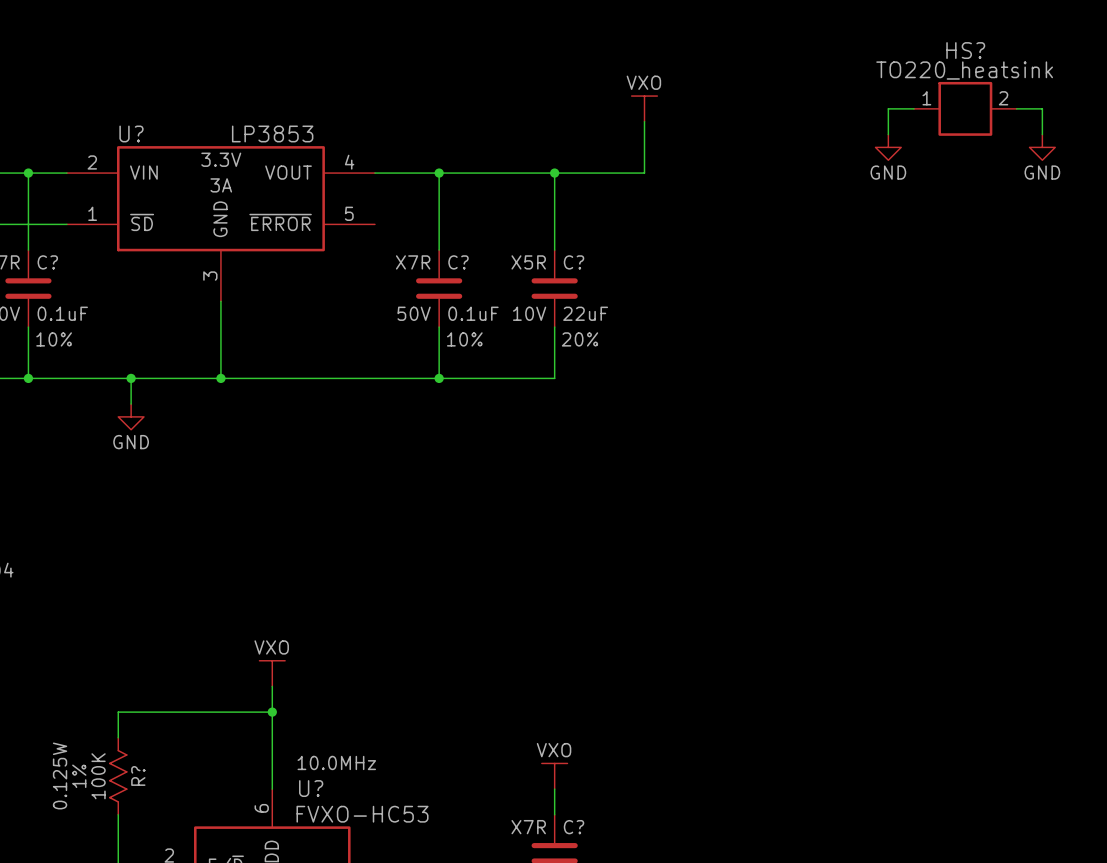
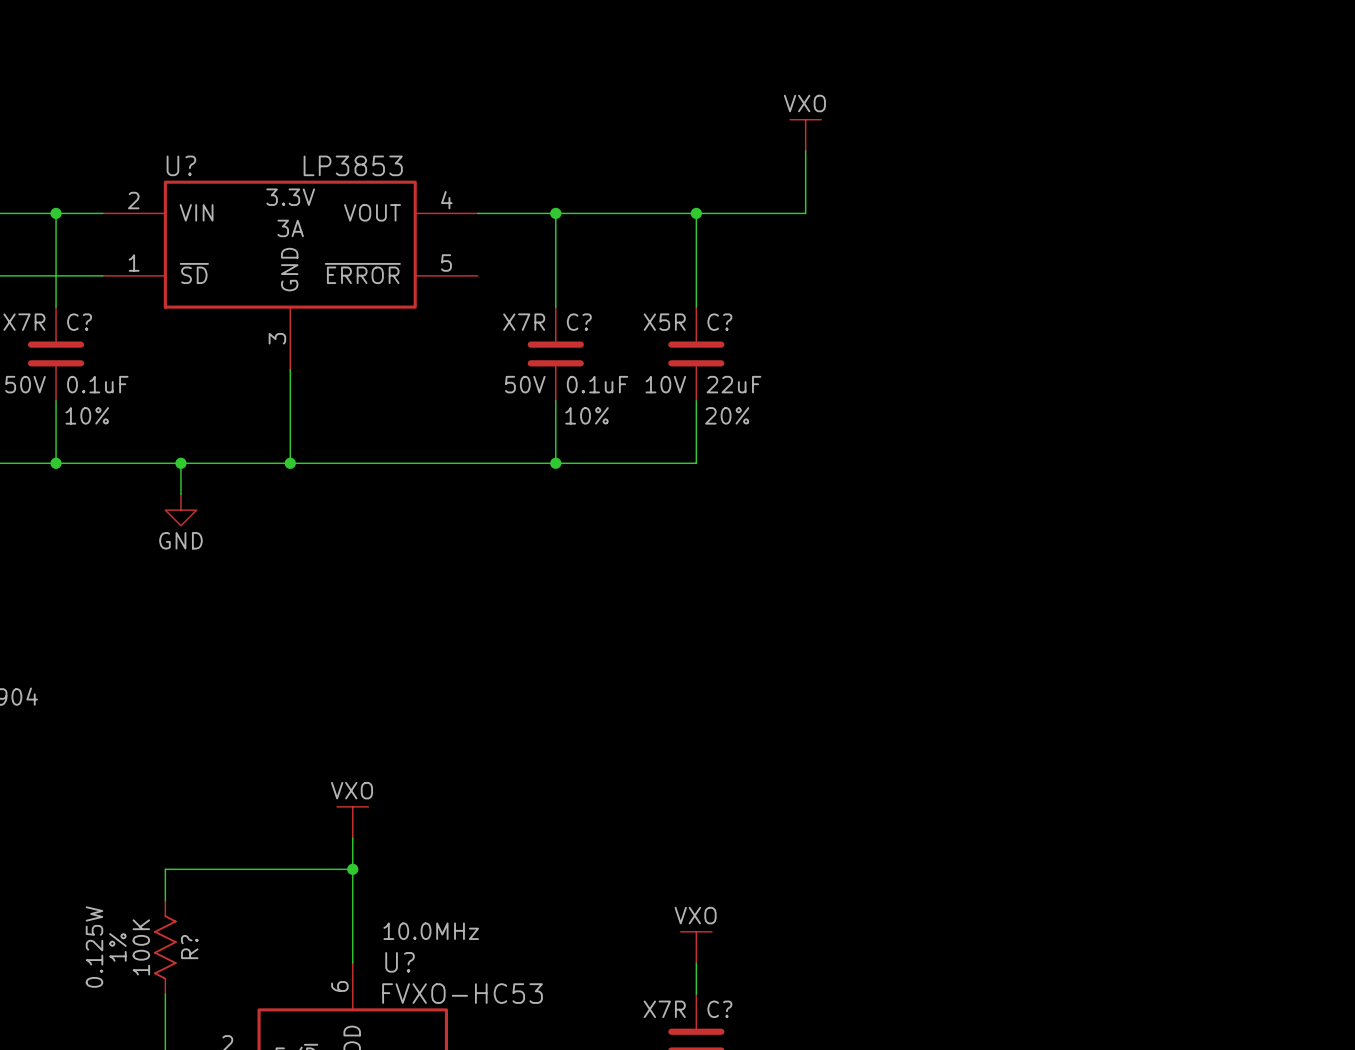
wire: (914, 108) (888, 108) (888, 134) -> none
HS?: TO220_heatsink (965, 108) -> none
wire: (1016, 108) (1042, 108) (1042, 134) -> none
power symbol: GND (888, 147) -> none
power symbol: GND (1042, 147) -> none

